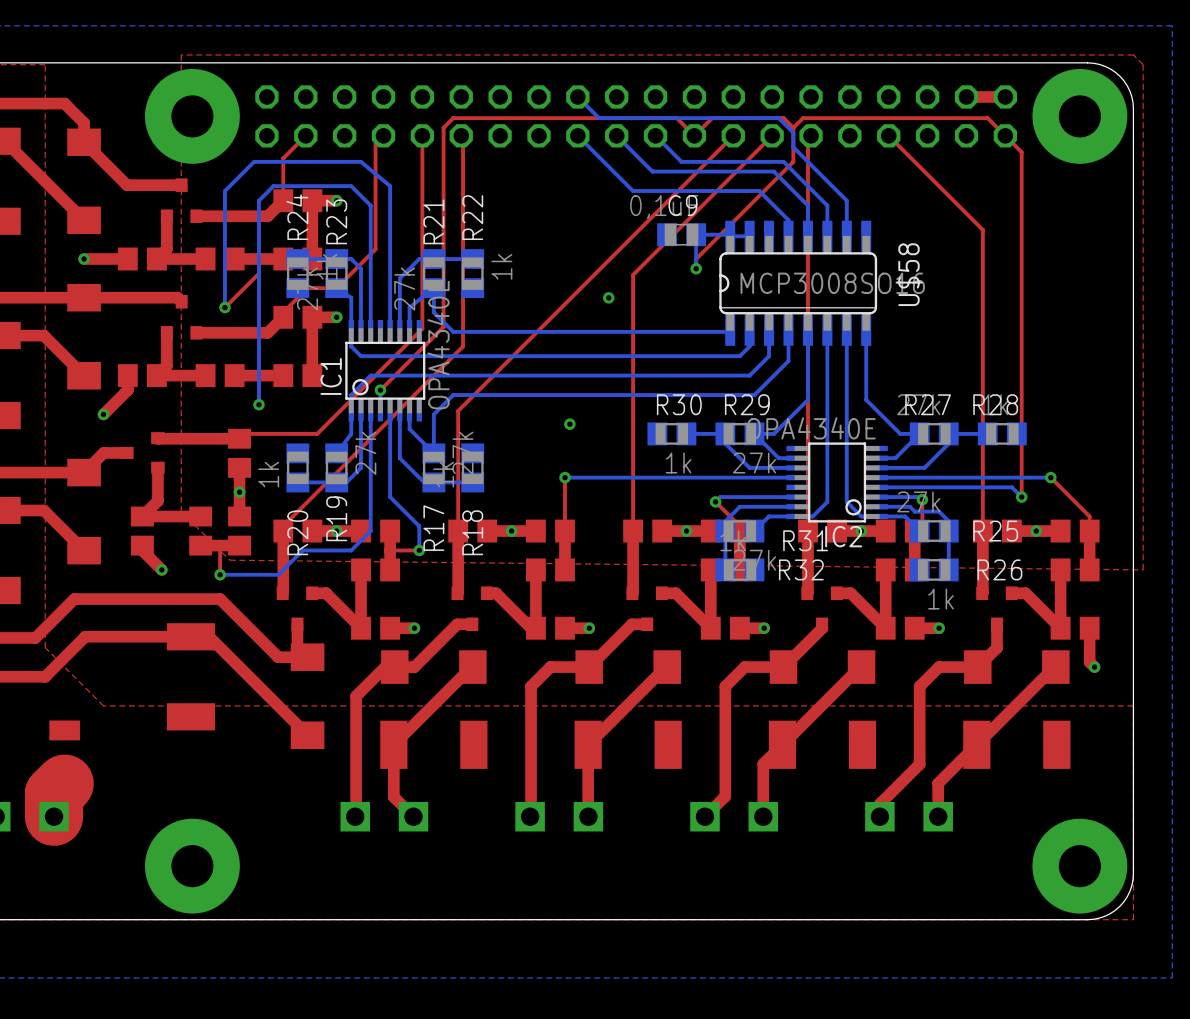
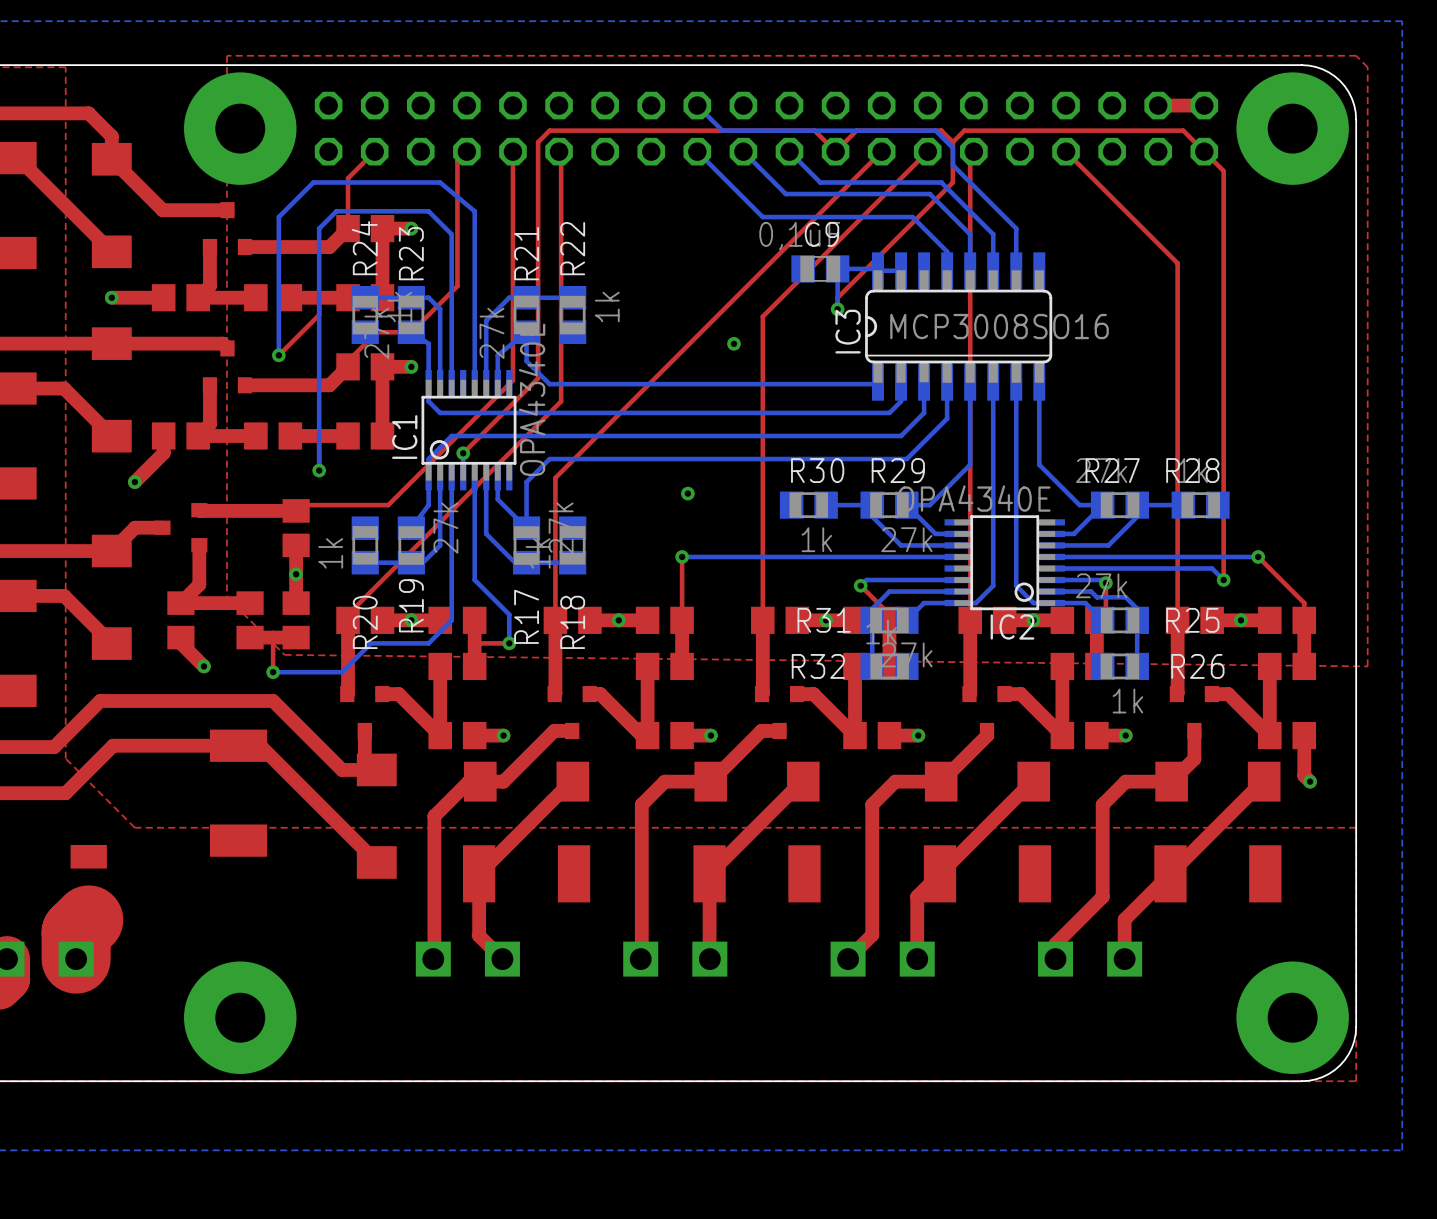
U$58 name: U$58 (908, 274) -> IC3 (848, 331)
R31 name position: R31 (805, 540) -> R31 (824, 620)
R32 name position: R32 (801, 569) -> R32 (818, 666)

